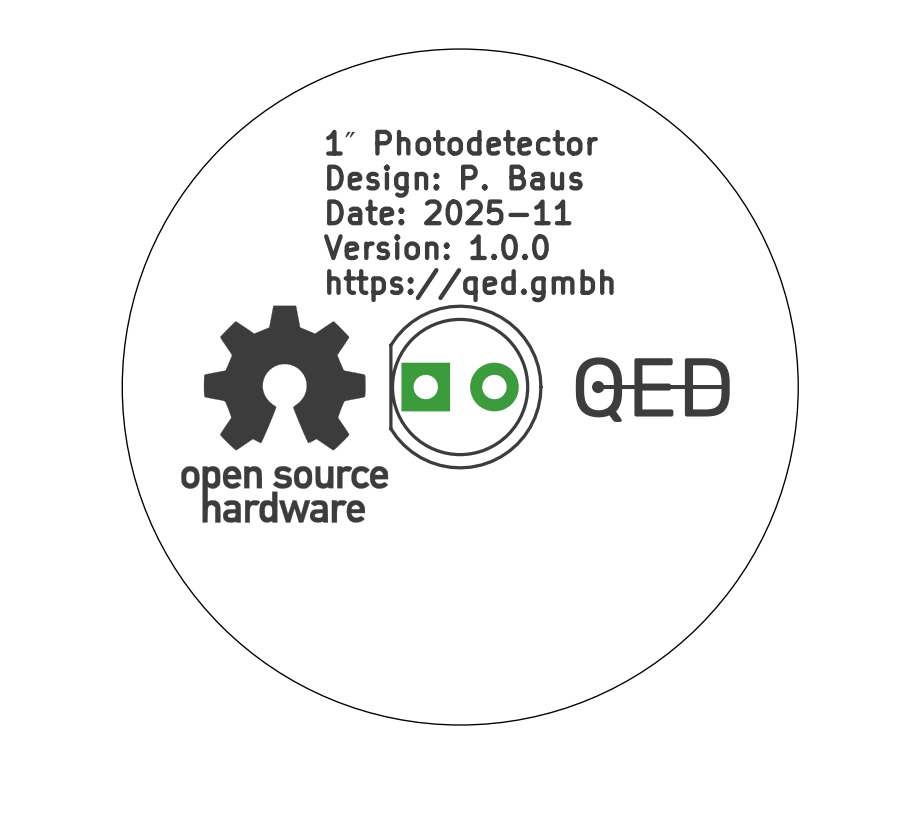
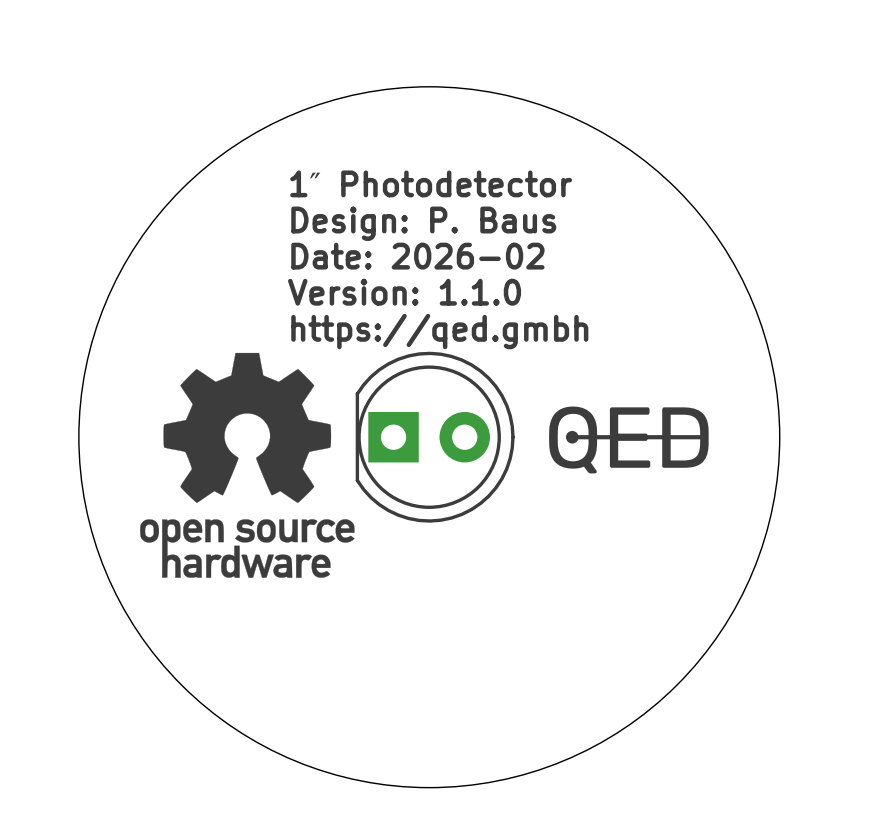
text: Date: 2025-11 (449, 212) -> Date: 2026-02 (417, 256)
text: Version: 1.0.0 (436, 247) -> Version: 1.1.0 (404, 292)

